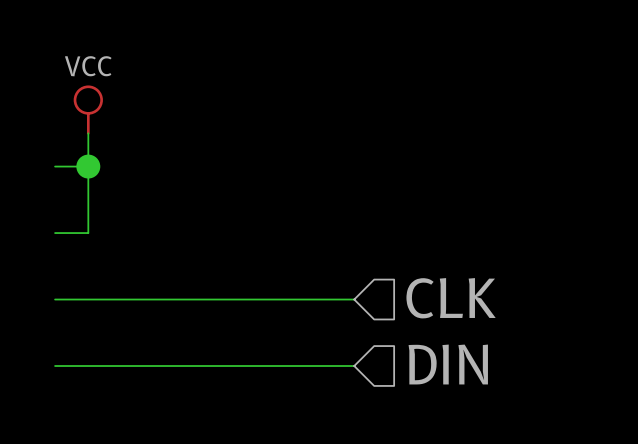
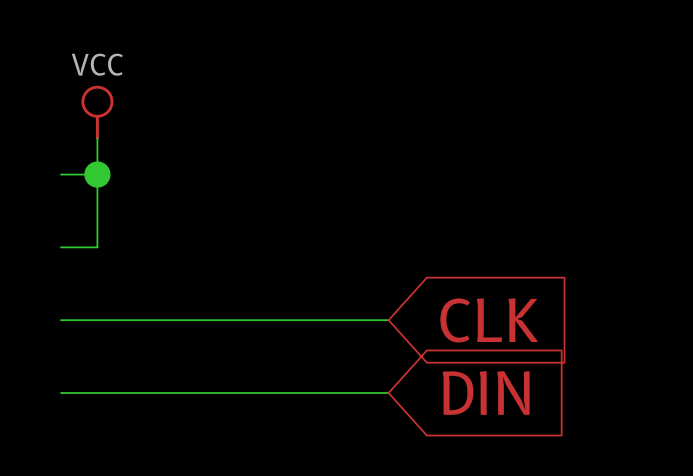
hierarchical label: CLK (451, 298) -> none
global label: none -> CLK (489, 320)
hierarchical label: DIN (448, 364) -> none
global label: none -> DIN (486, 392)

